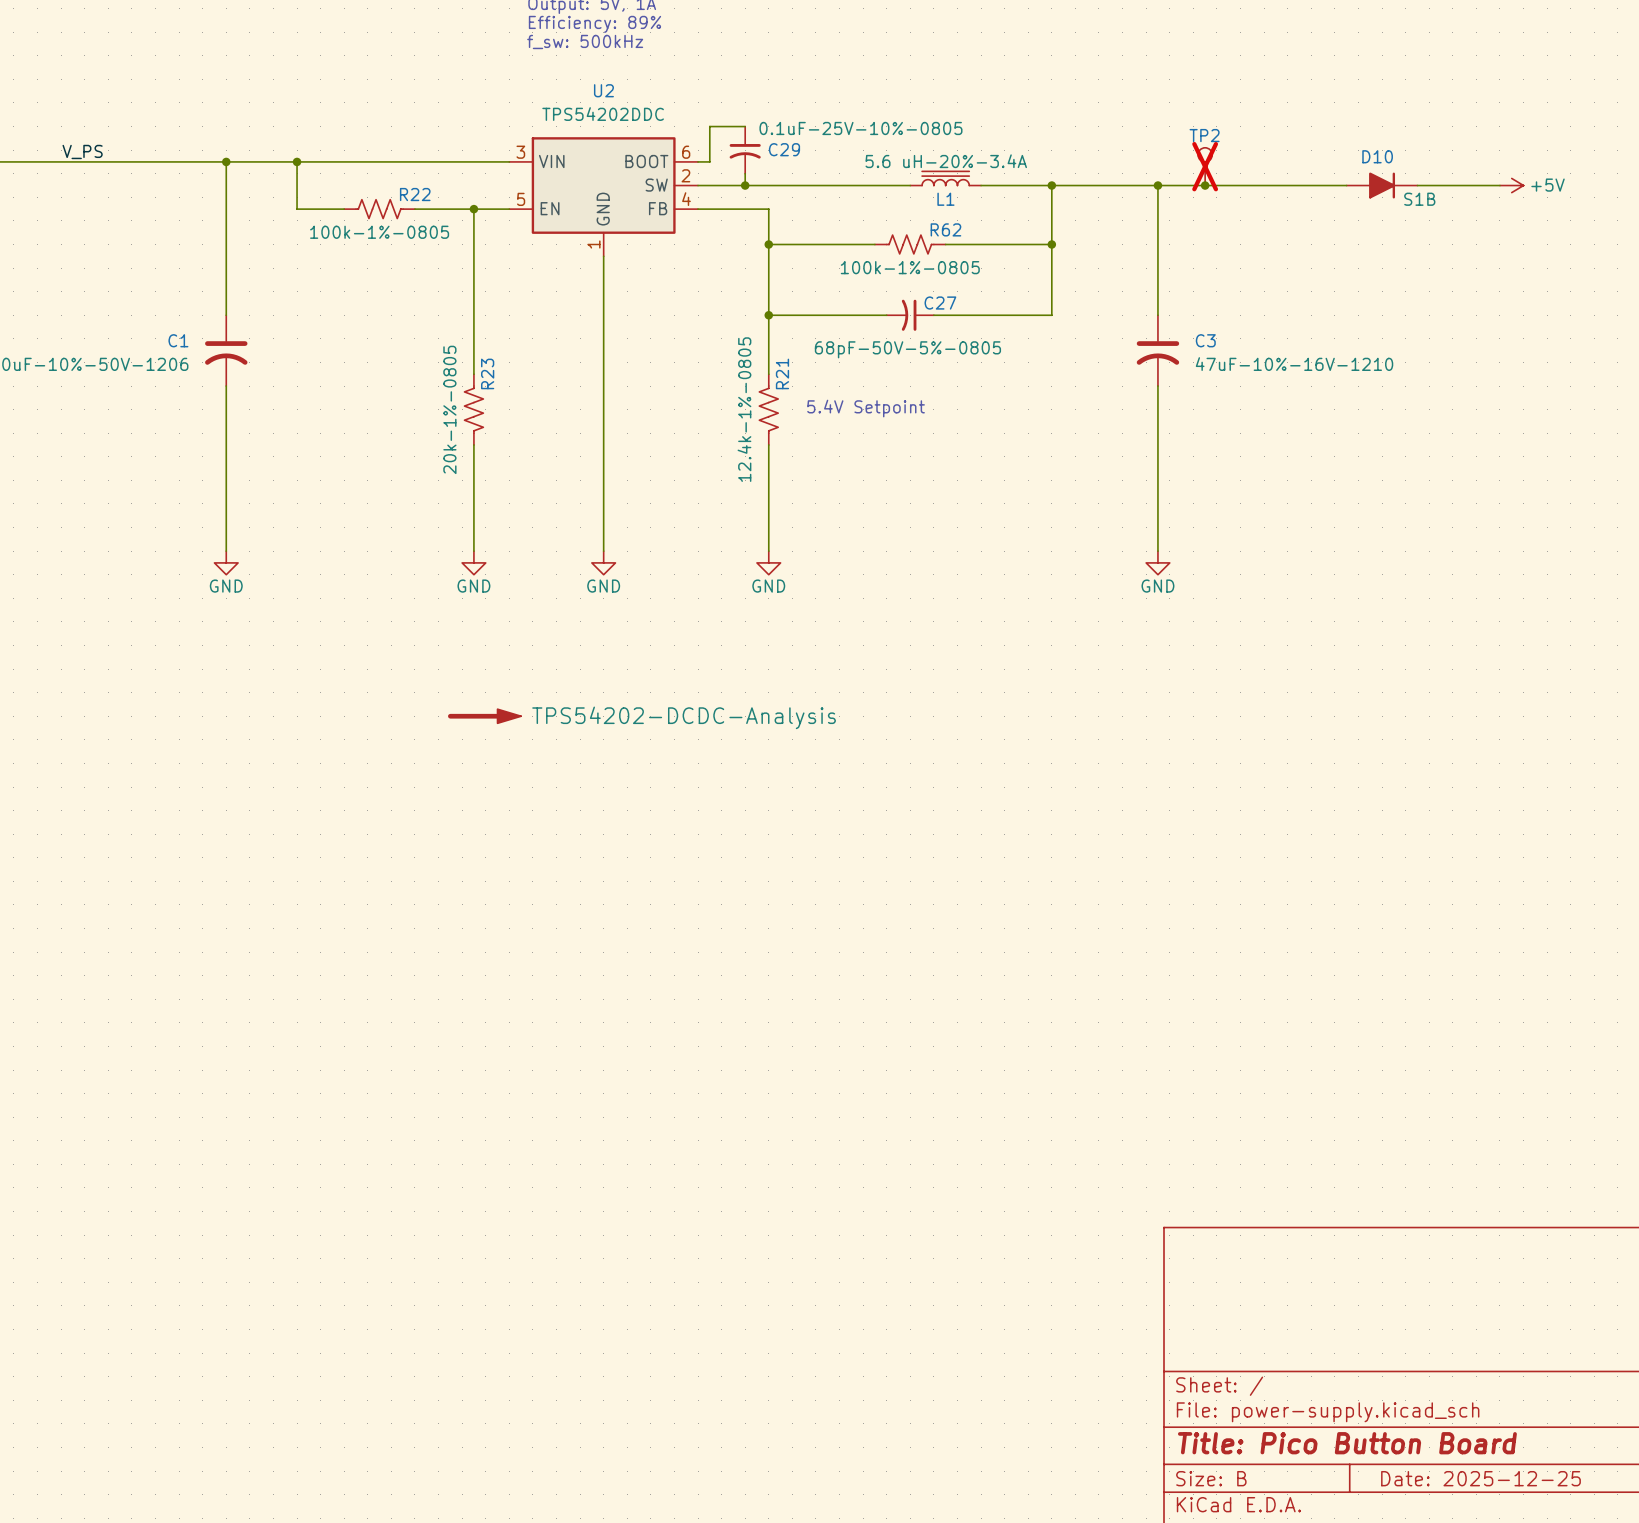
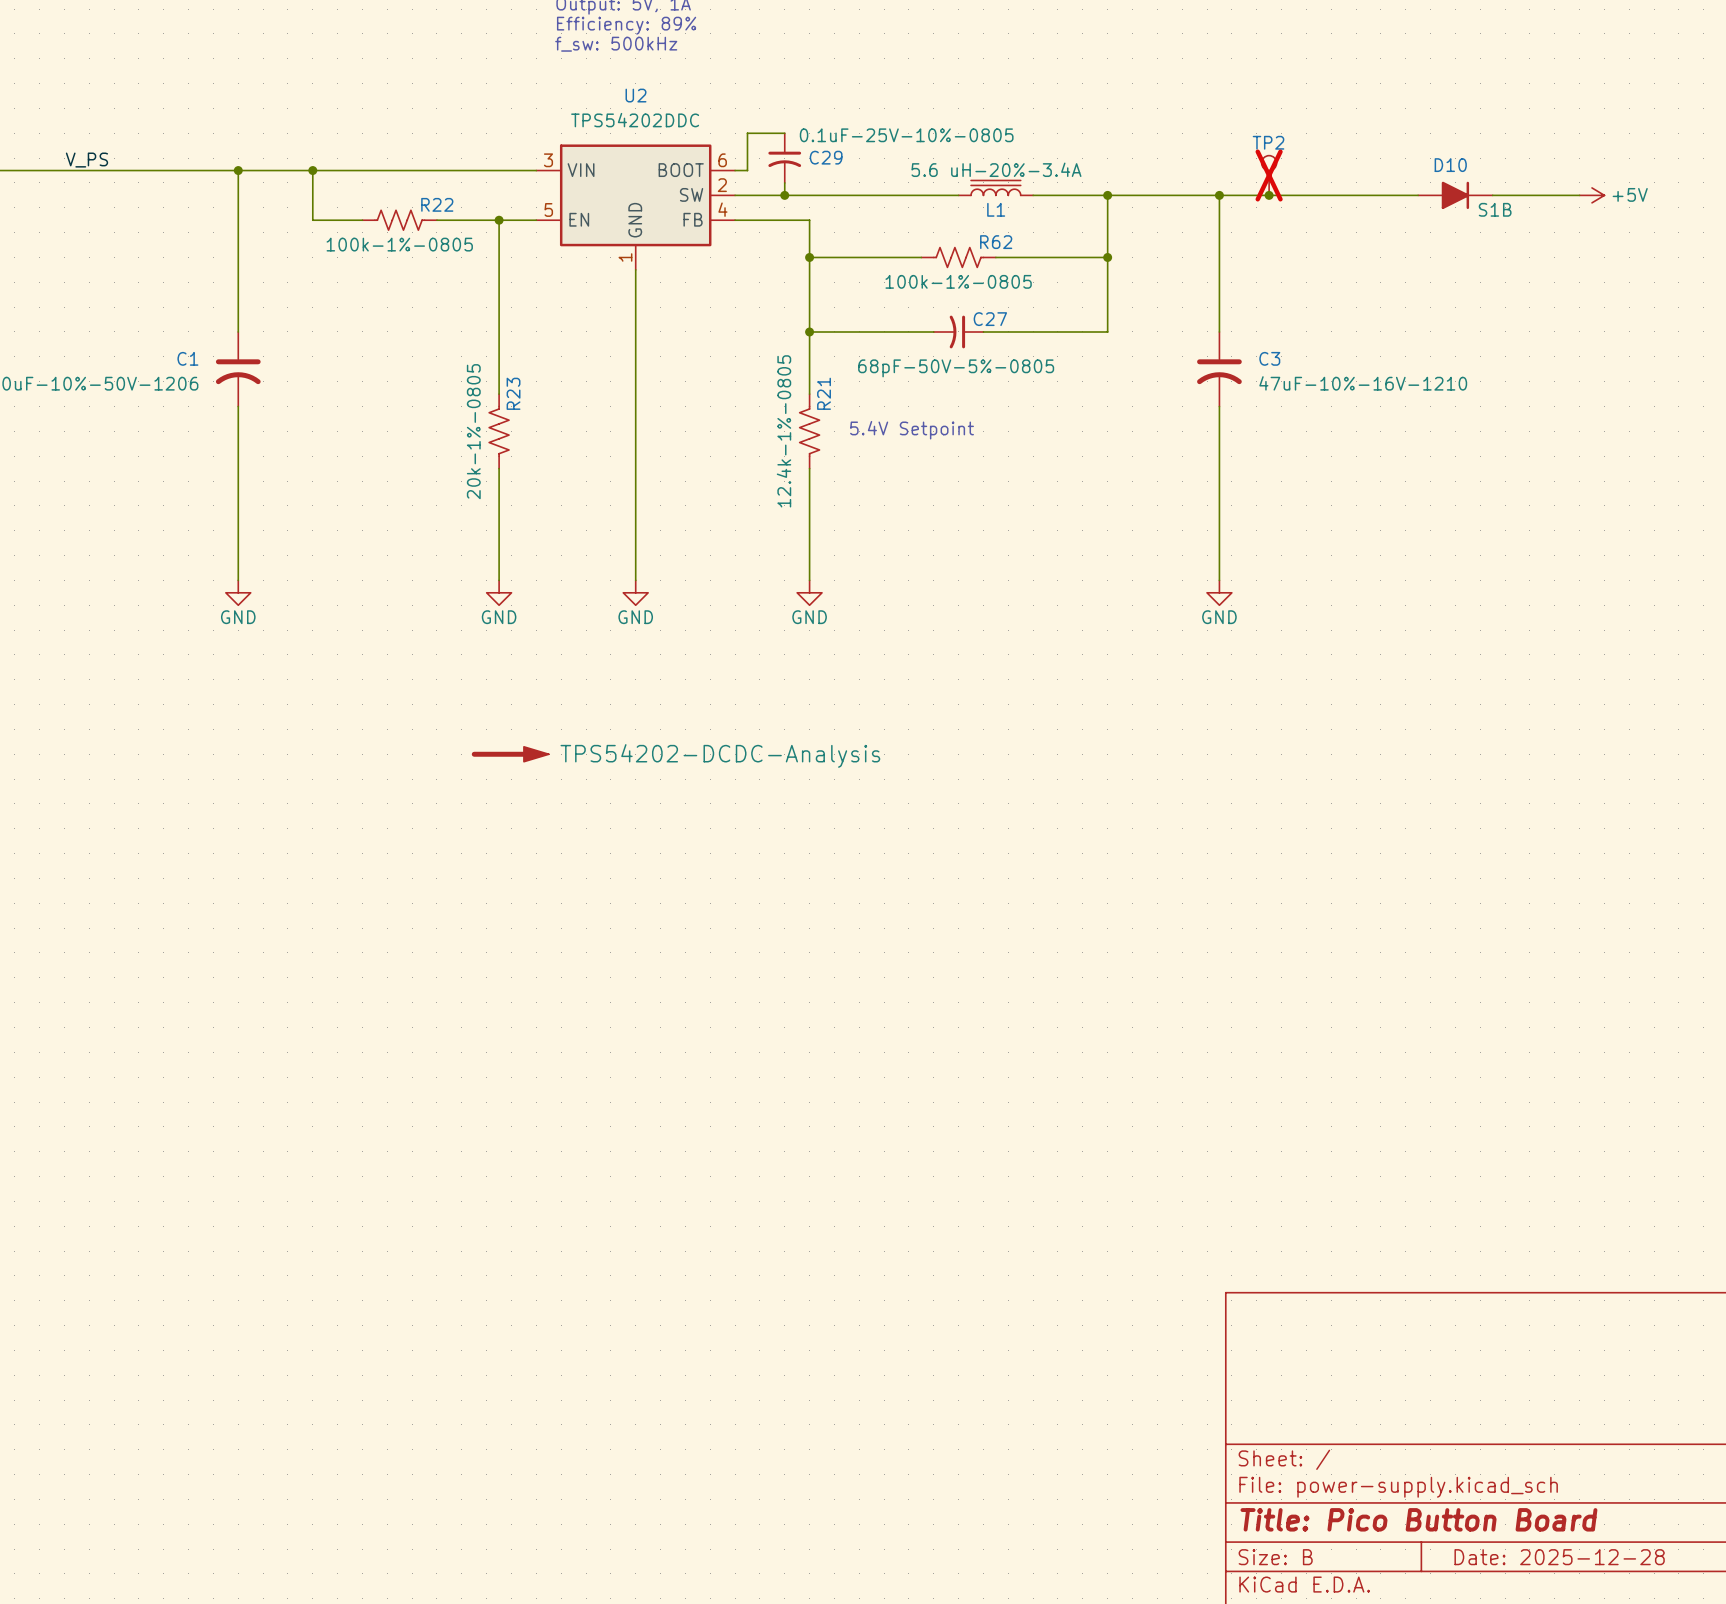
title block: Date: 2025-12-25 (1480, 1478) -> Date: 2025-12-28 (1559, 1557)

